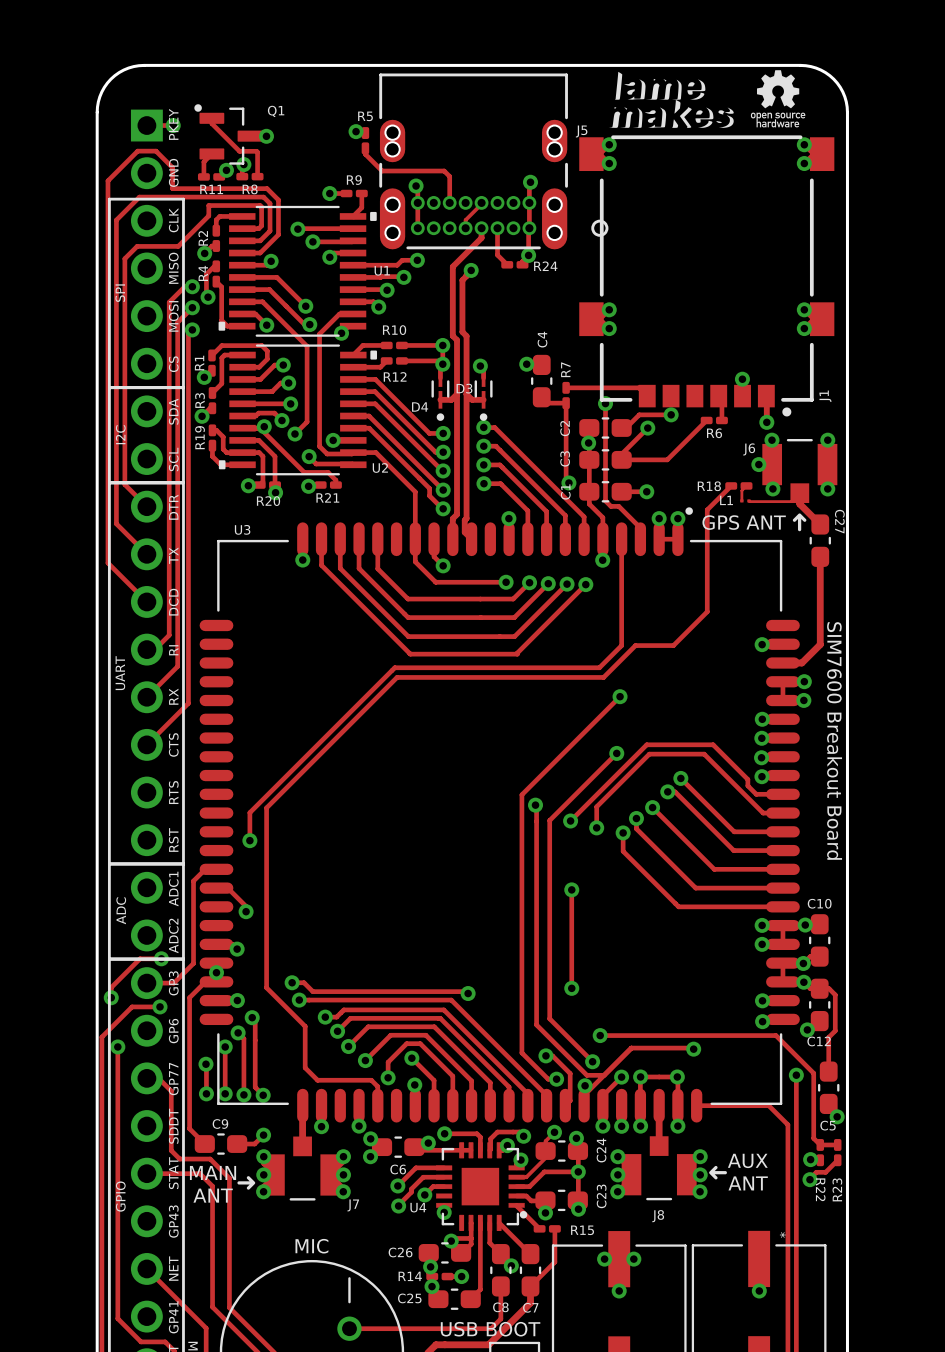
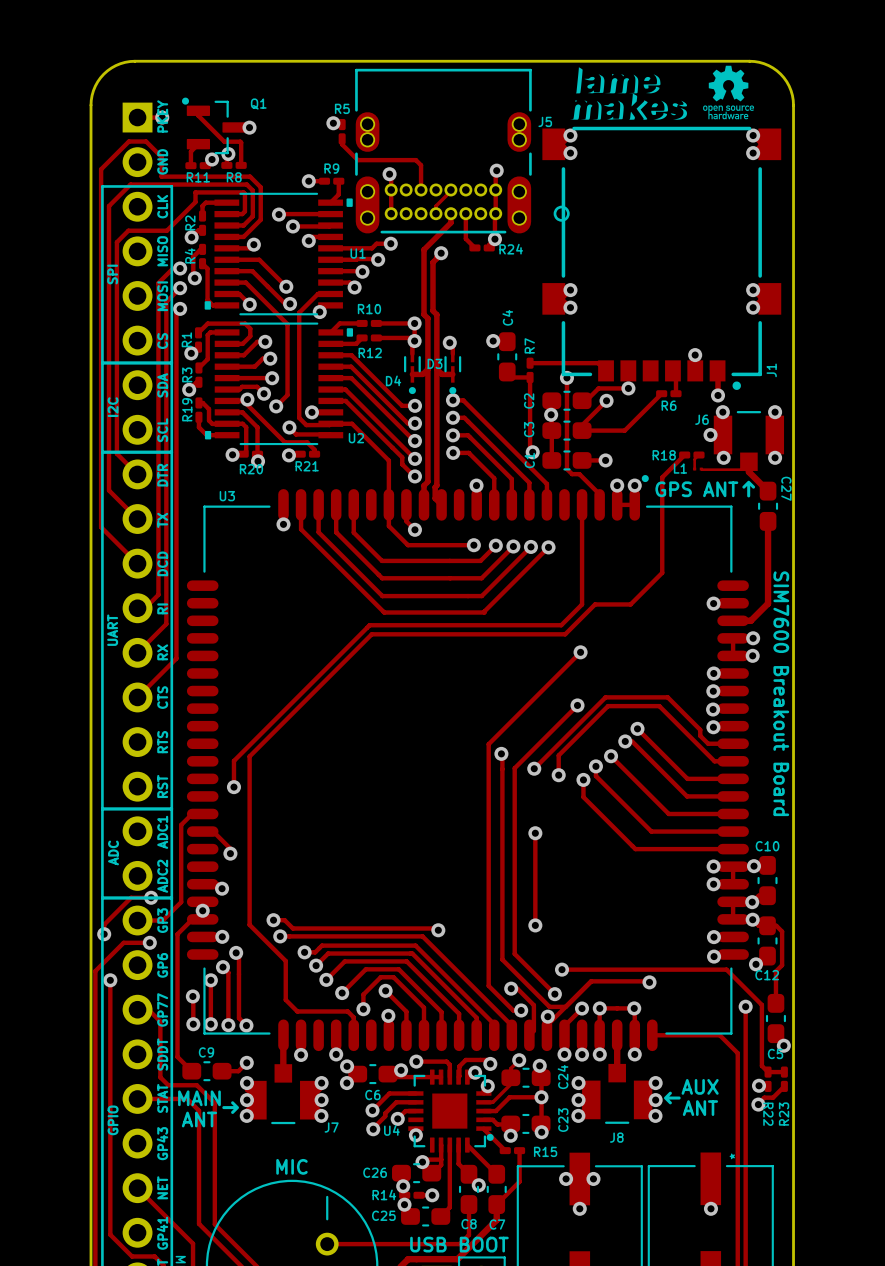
track: (589, 491) (589, 504) (602, 517) (602, 560) -> none
via: (602, 560) -> none

